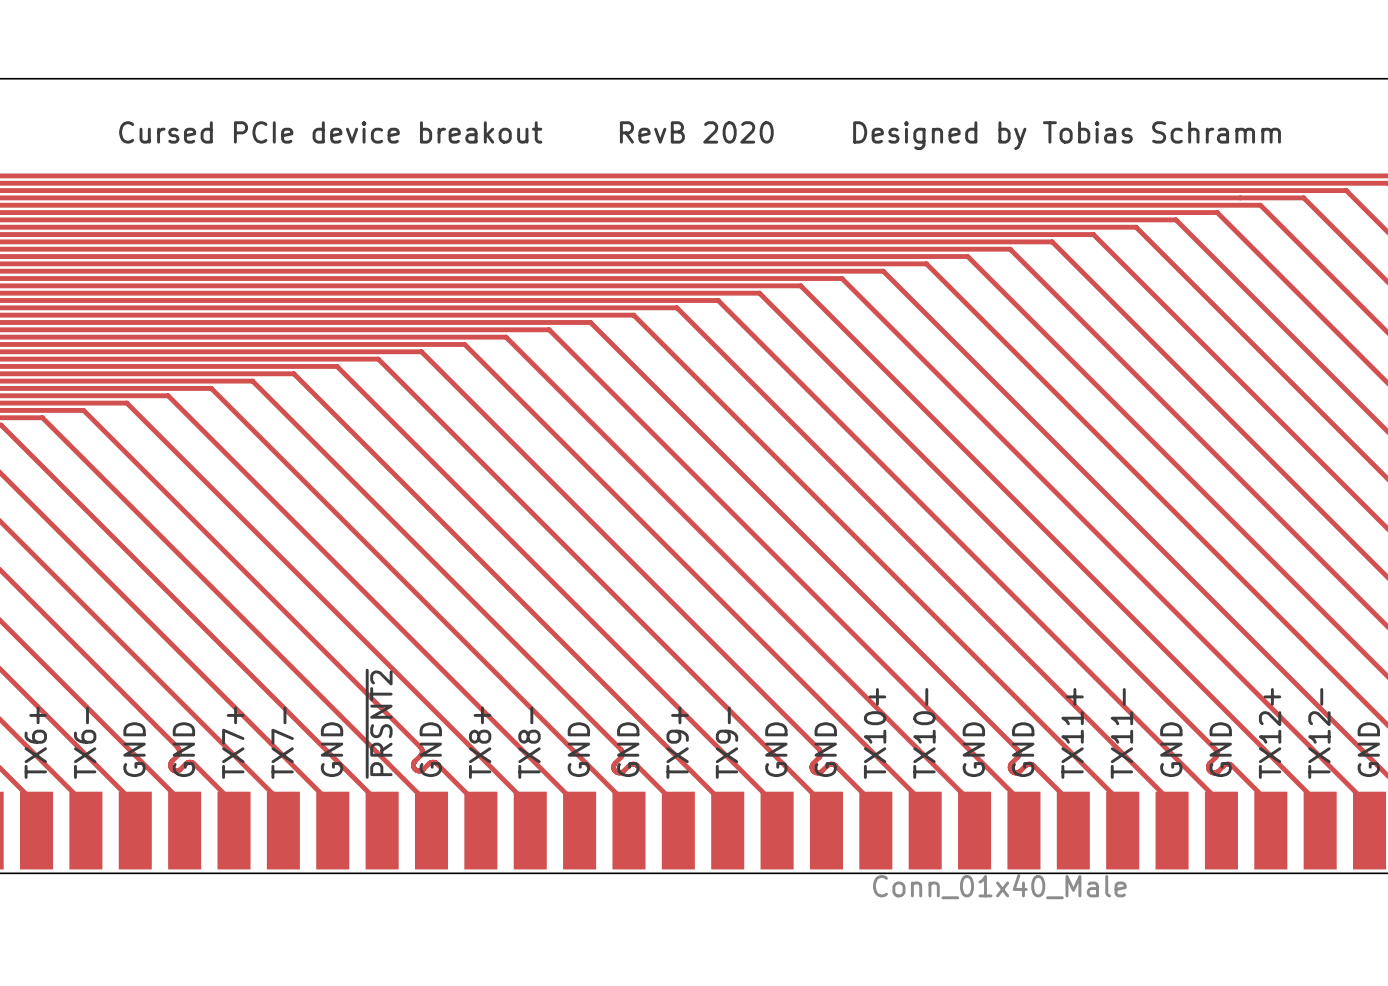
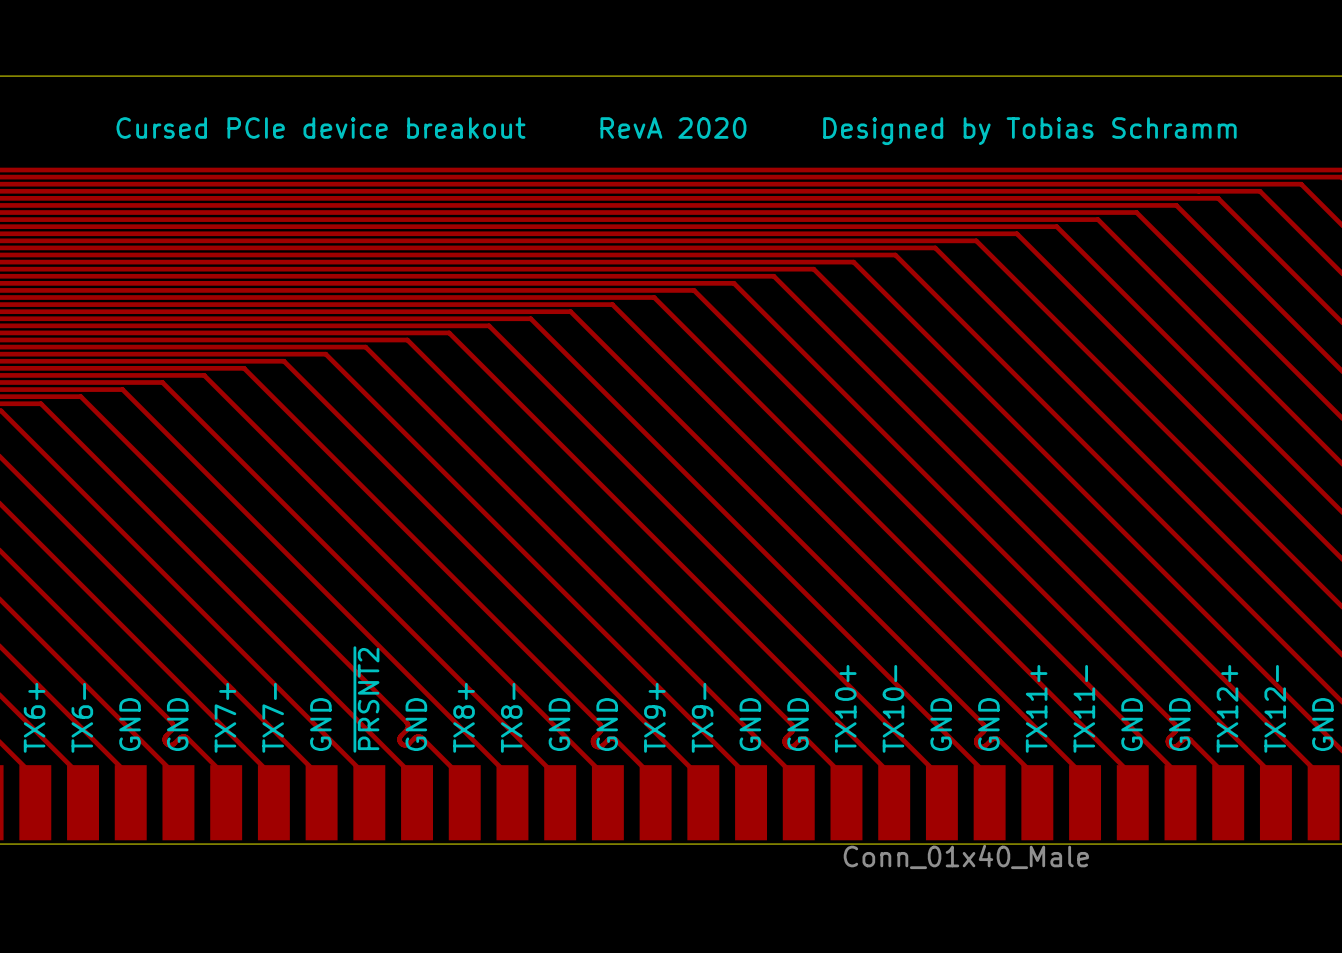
text: Cursed PCIe device breakout RevB 2020 Designed by Tobias Schramm (700, 135) -> Cursed PCIe device breakout RevA 2020 Designed by Tobias Schramm (676, 131)

